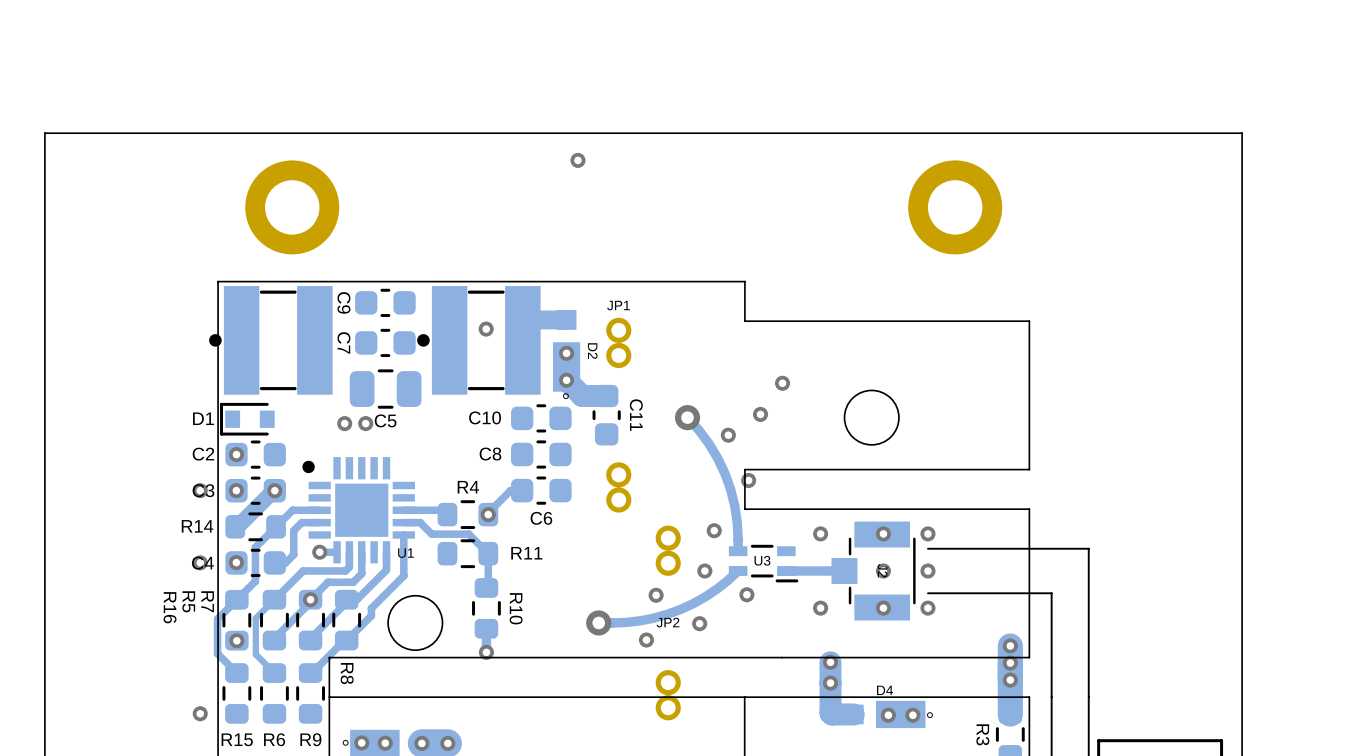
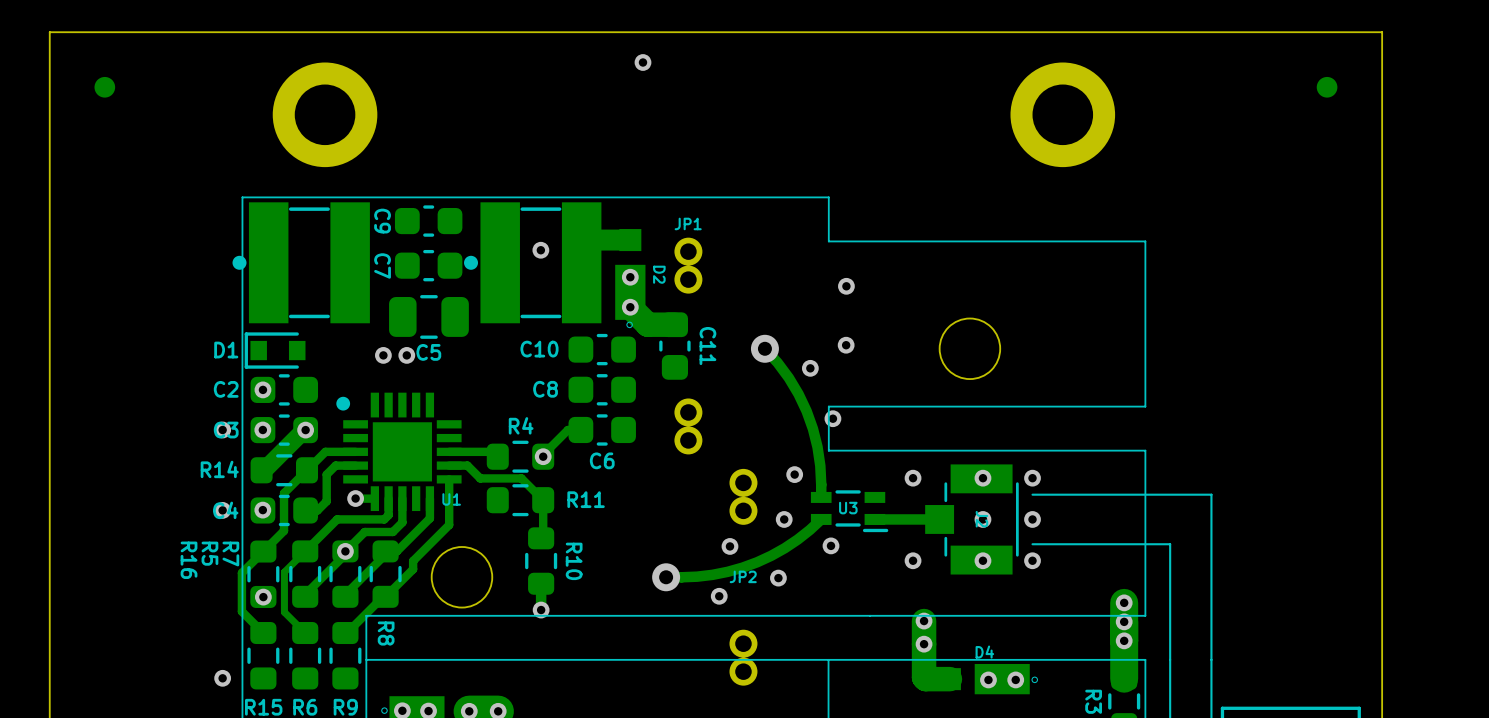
part: none -> (104, 87)
part: none -> (1327, 87)
via position: (782, 383) -> (846, 286)

